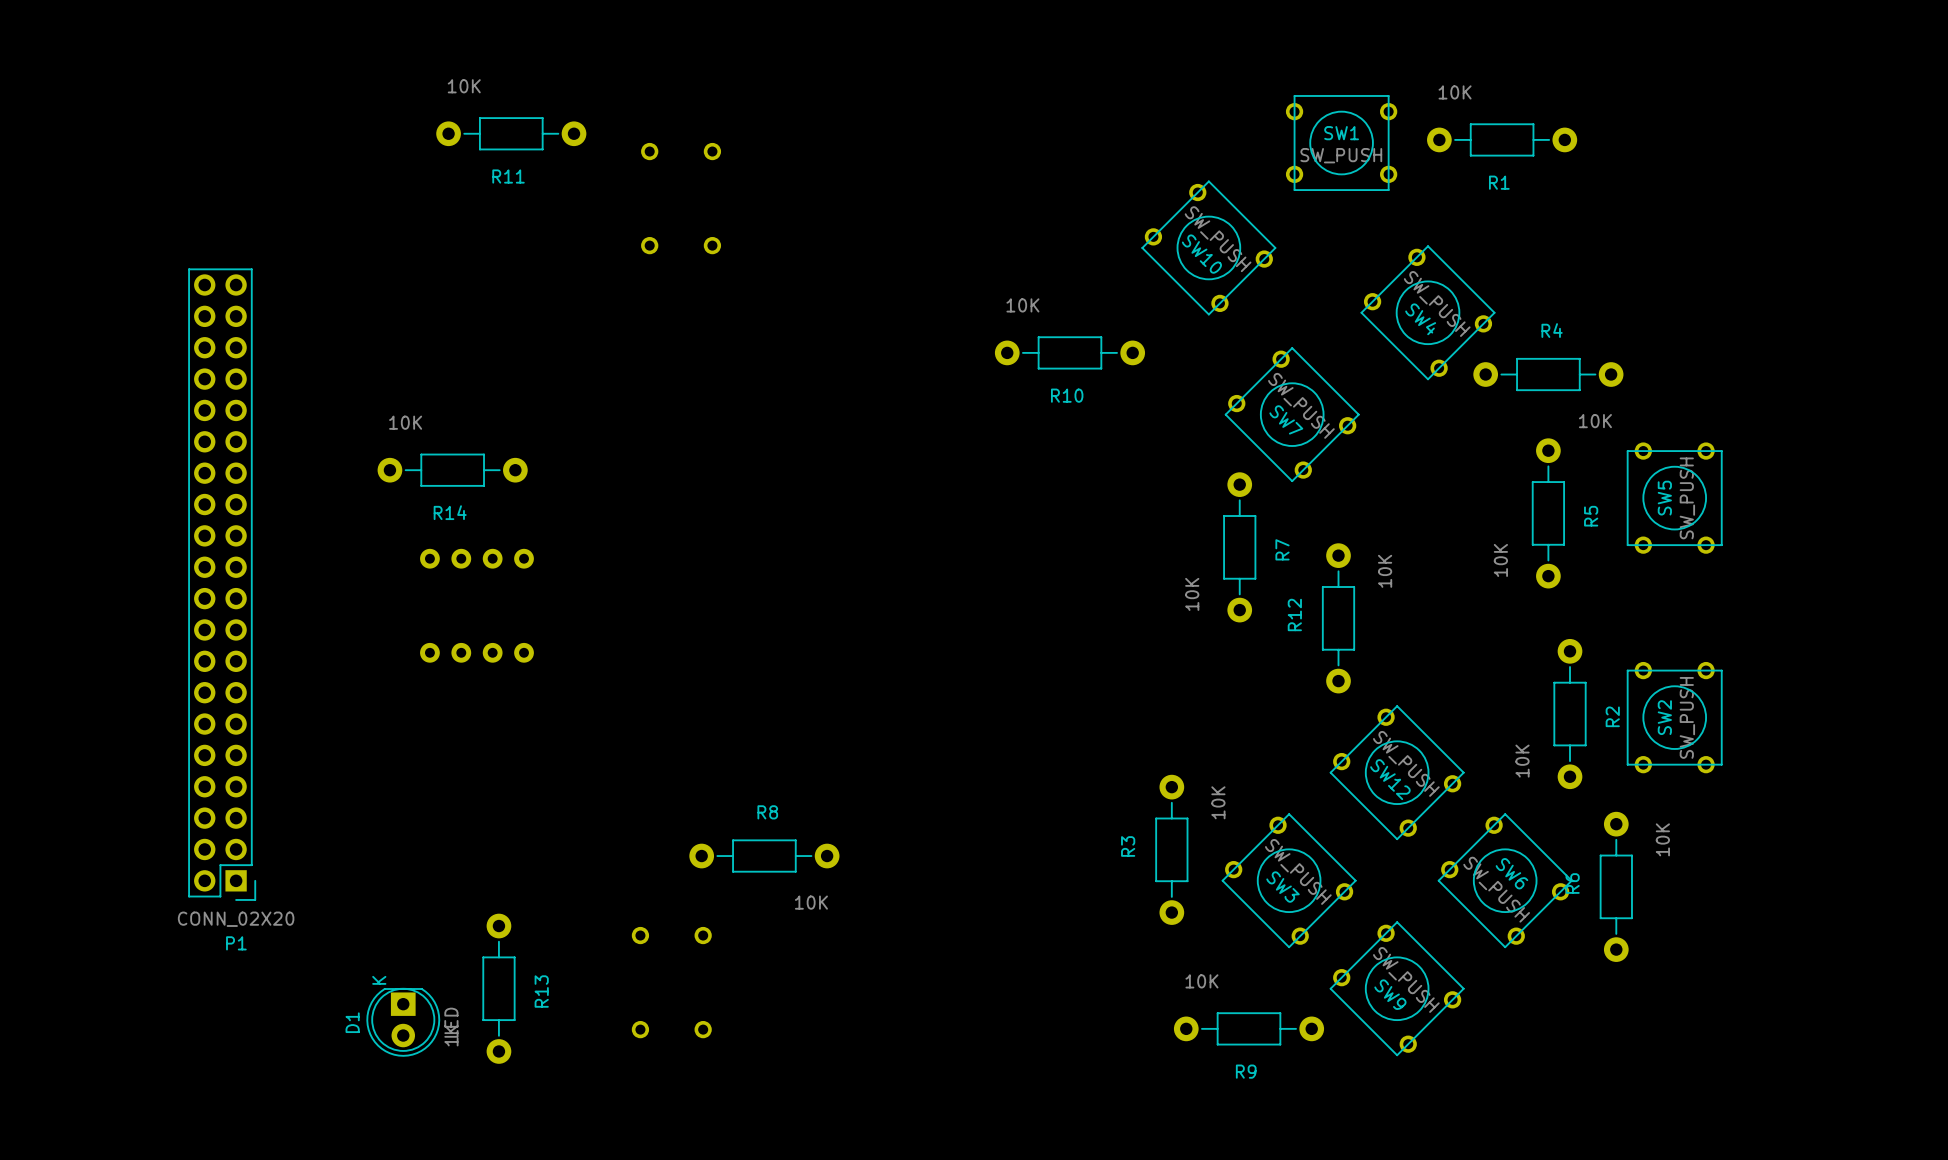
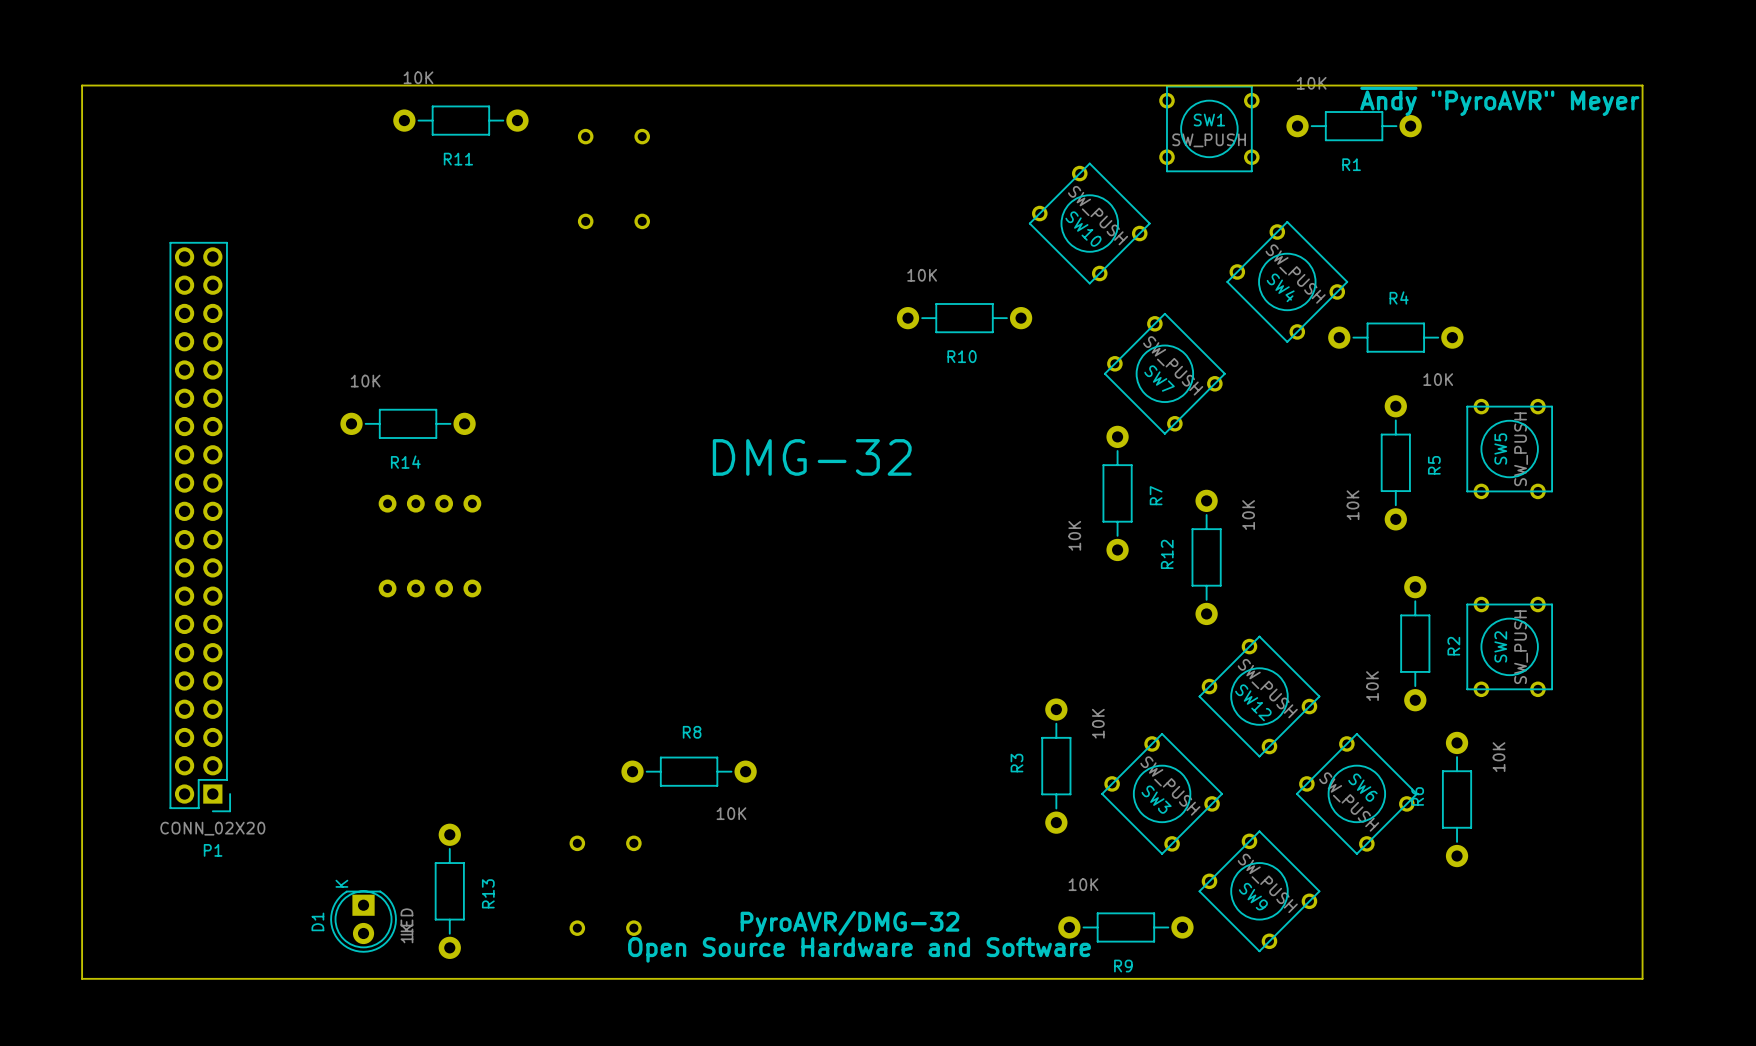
board edge: none -> (82, 85) (82, 978) (1642, 978) (1642, 85) (82, 85)
text: none -> ~{Andy} "PyroAVR" Meyer (1499, 101)
text: none -> DMG-32 (812, 457)
text: none -> PyroAVR/DMG-32 (849, 924)
text: none -> Open Source Hardware and Software (859, 949)

